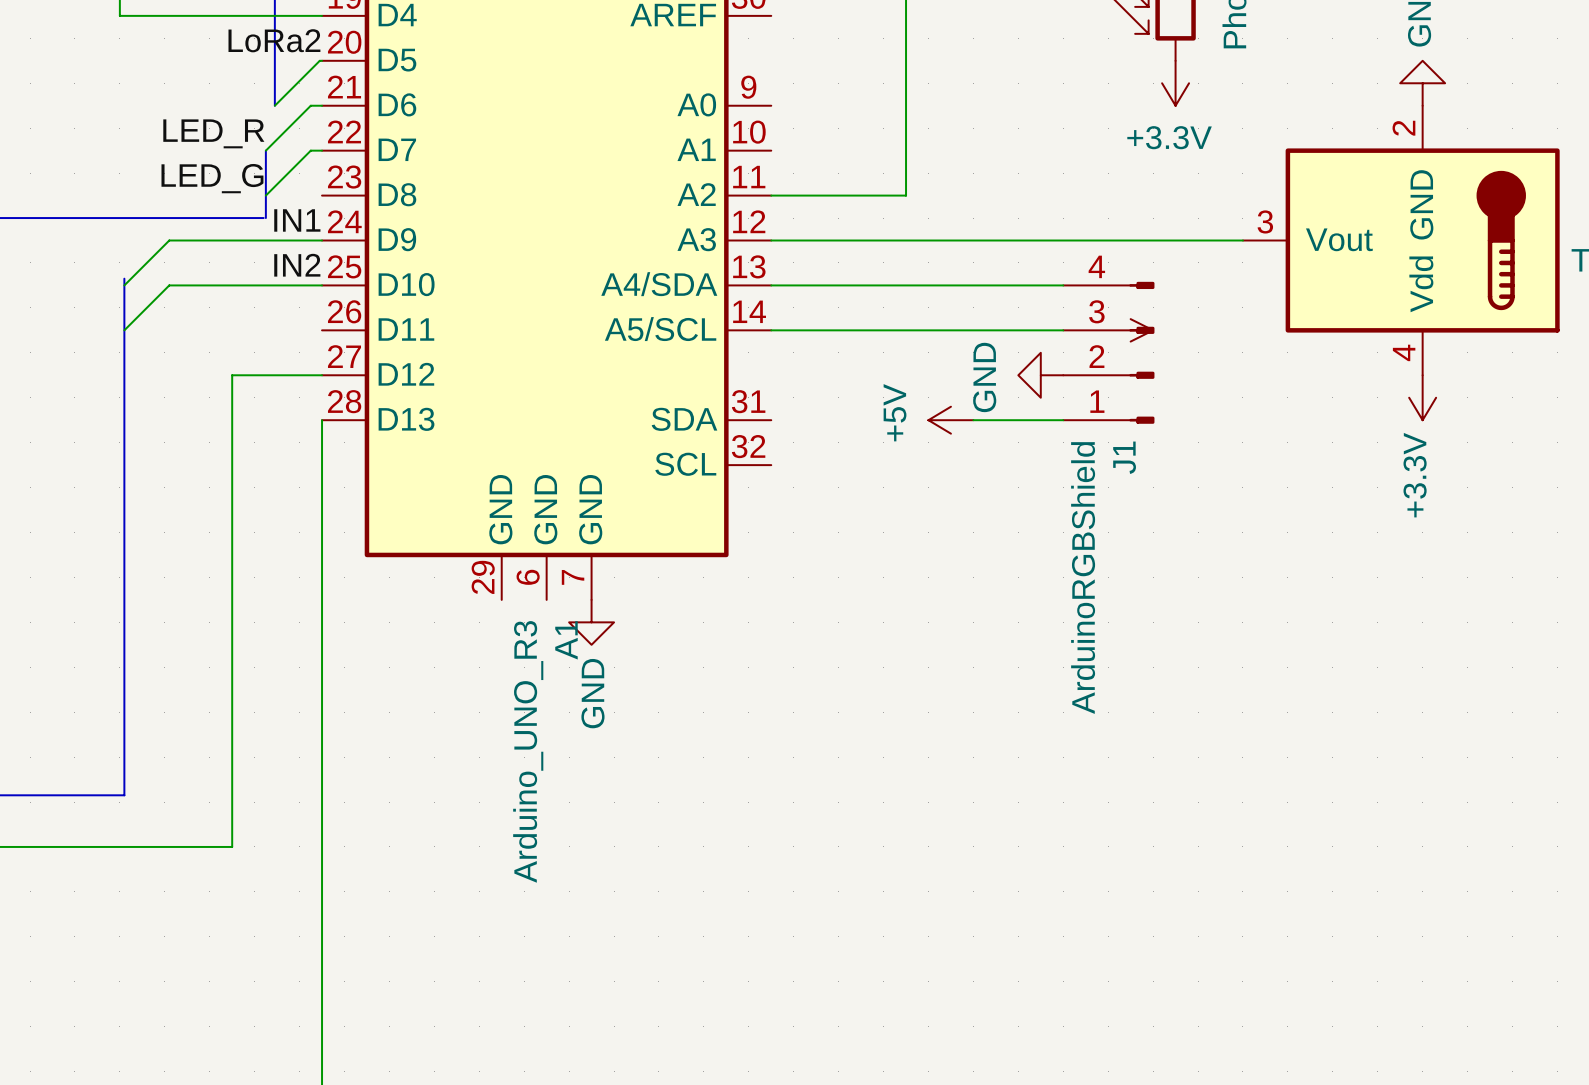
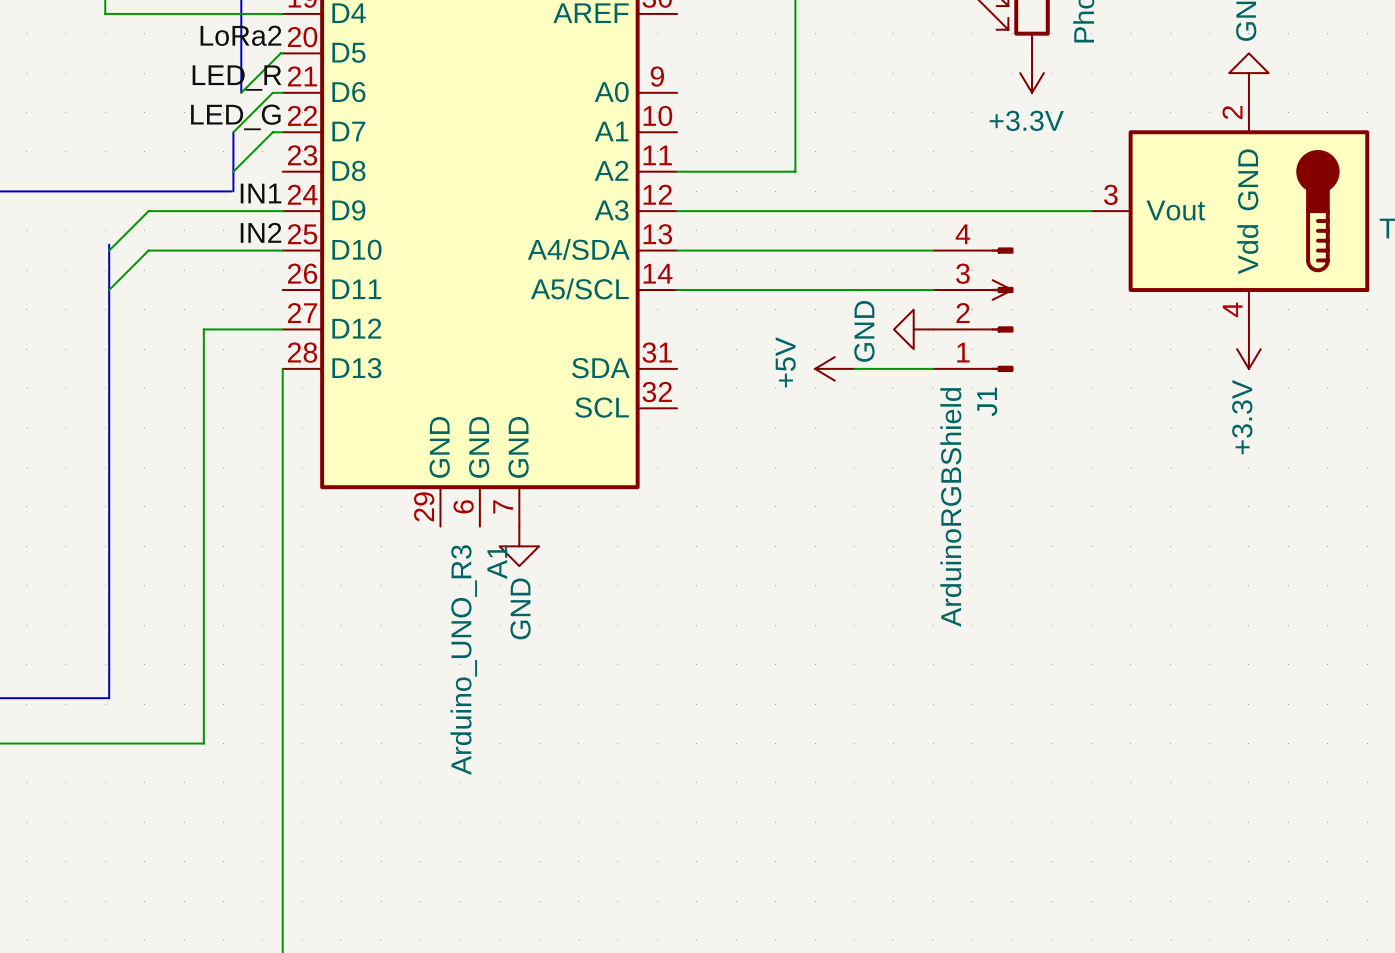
label position: LED_R (213, 133) -> LED_R (237, 78)
label position: LED_G (212, 178) -> LED_G (235, 117)

